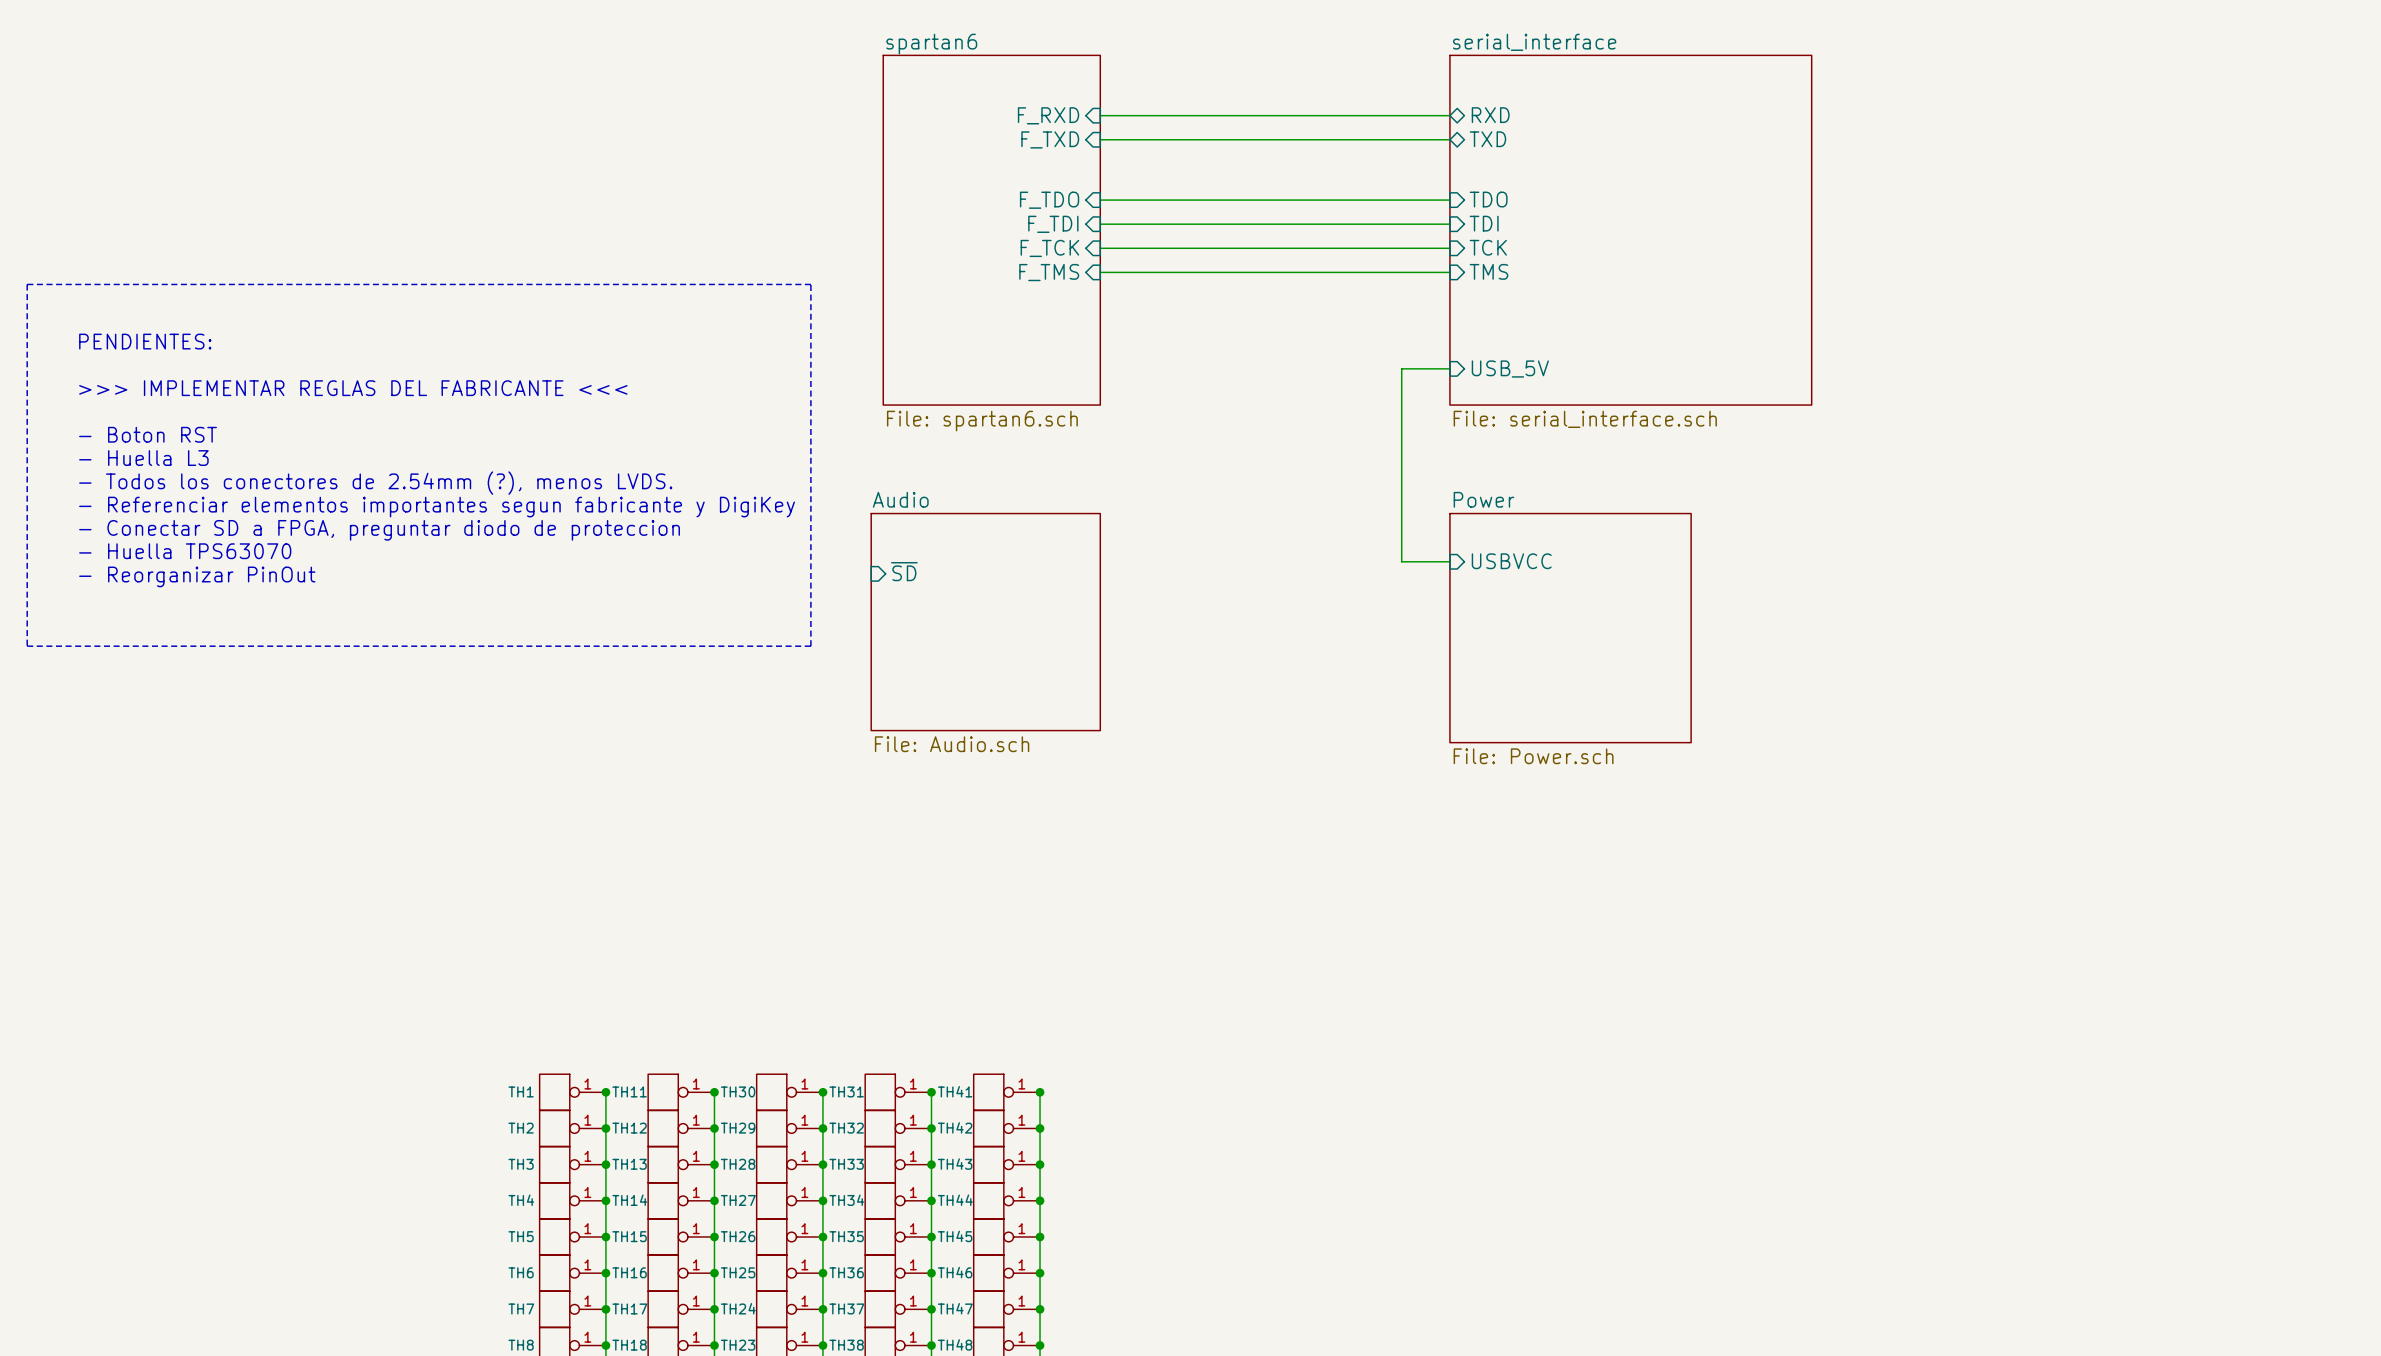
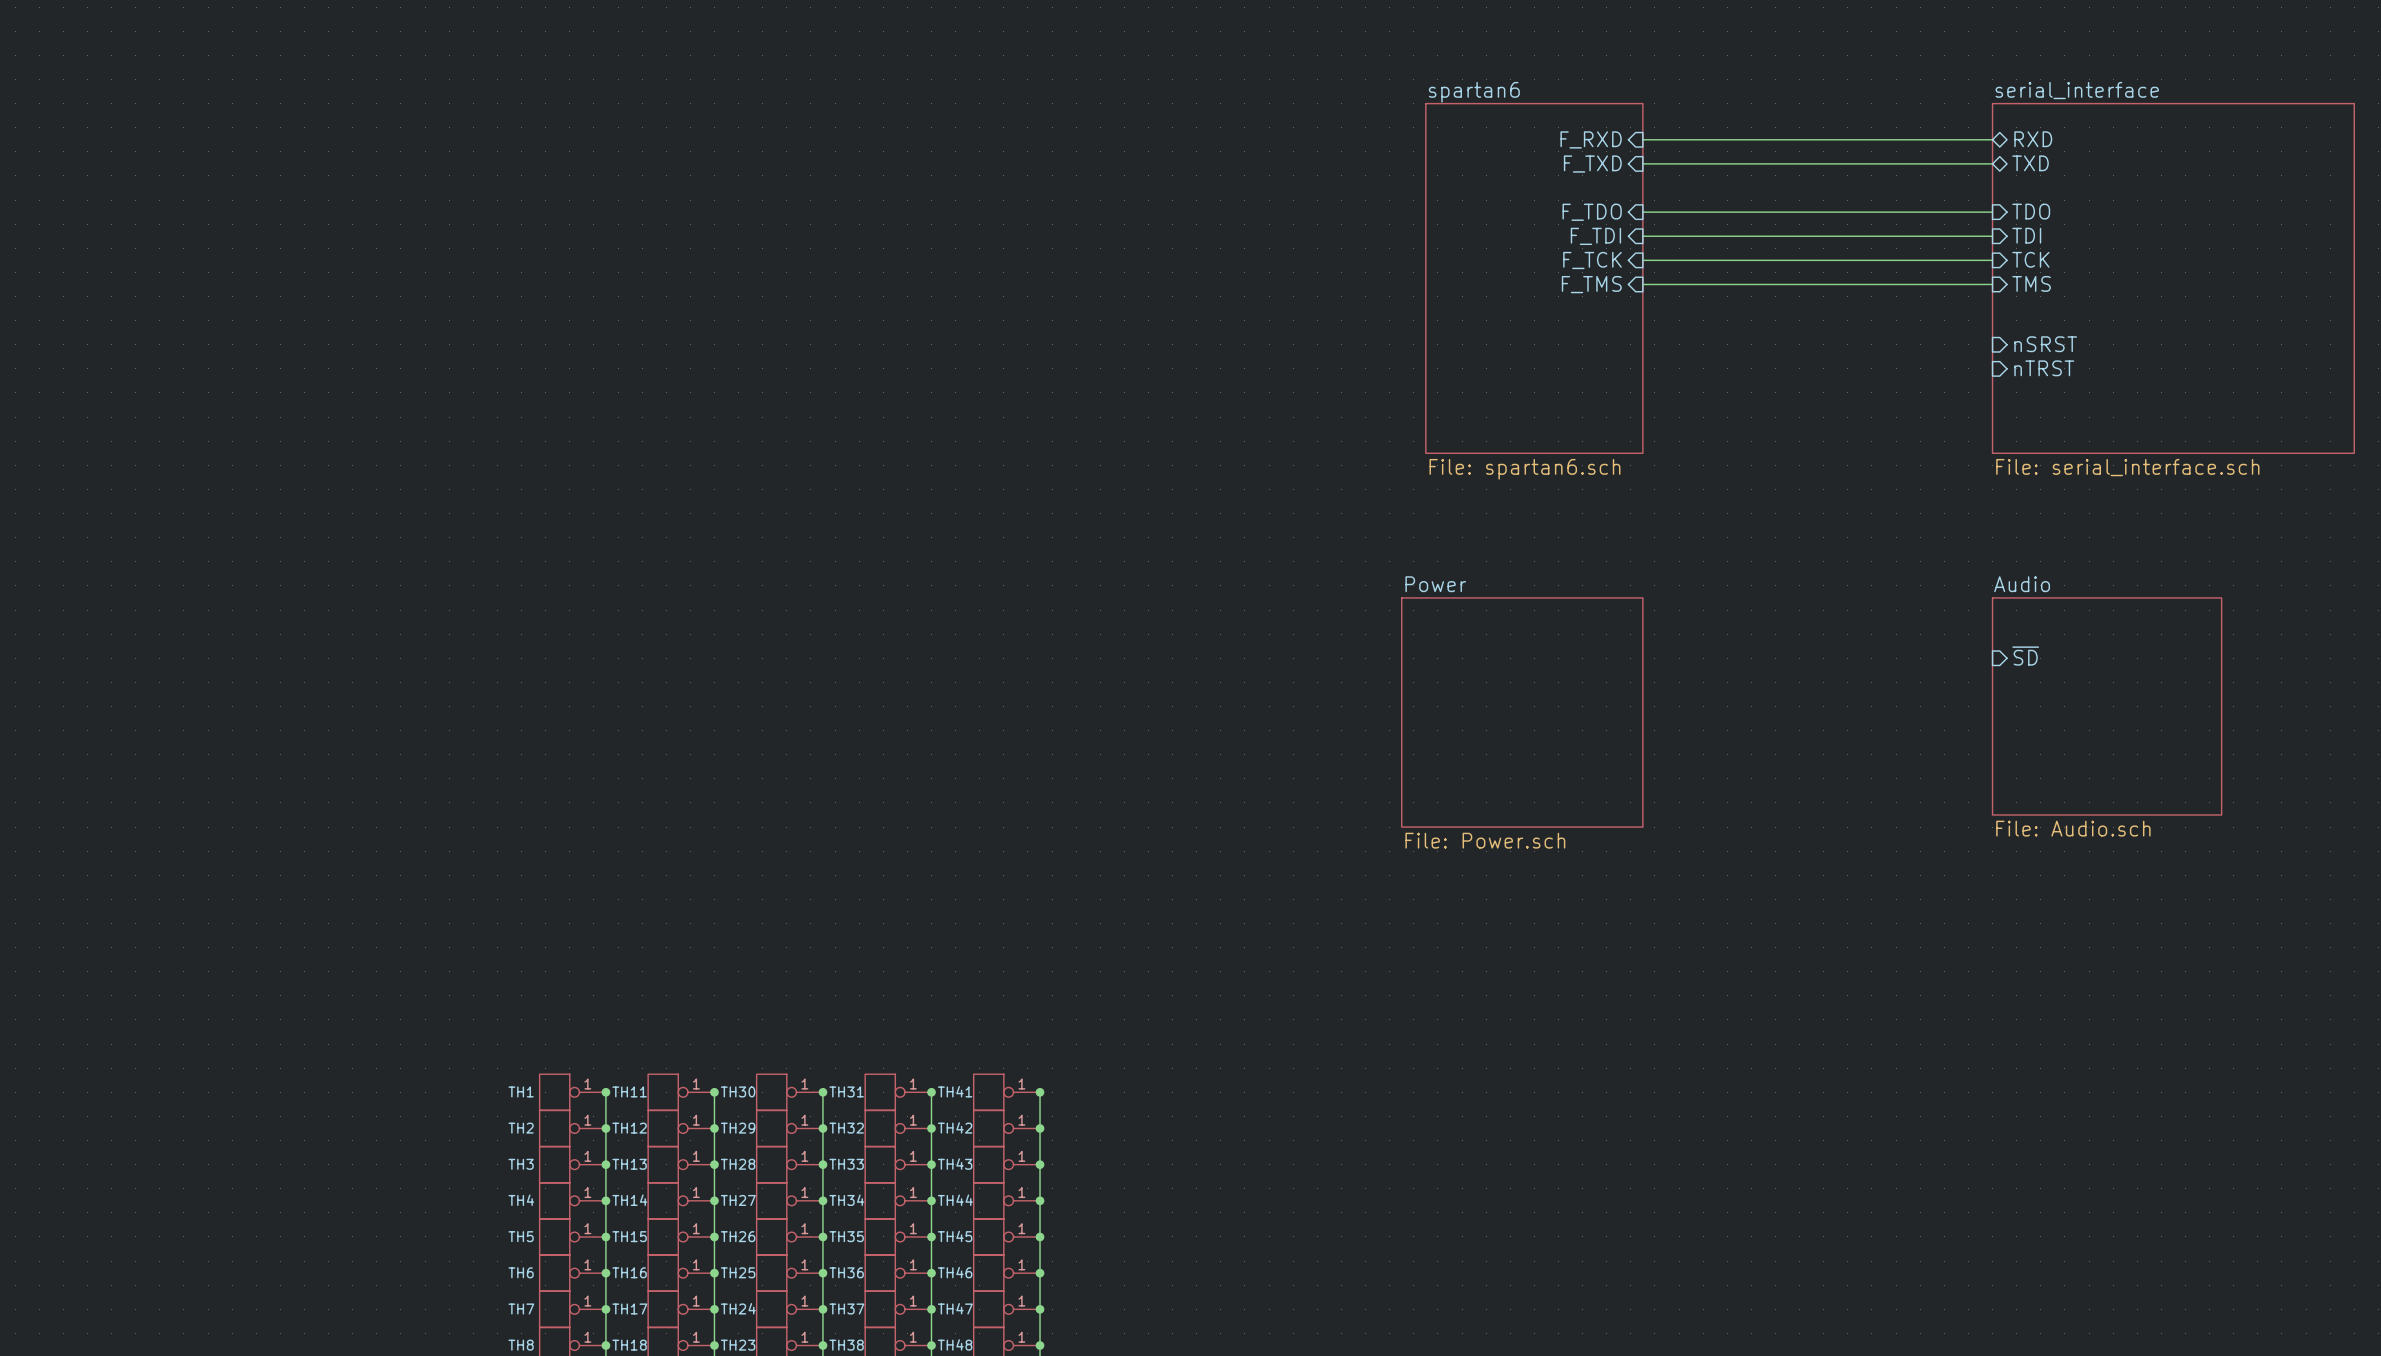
sheet pin: F_RXD (1048, 115) -> none
wire: (1100, 115) (1449, 115) -> none
sheet pin: RXD (1490, 115) -> none
sheet pin: F_TXD (1050, 139) -> none
wire: (1100, 139) (1449, 139) -> none
sheet pin: TXD (1487, 139) -> none
sheet pin: none -> F_RXD (1591, 139)
wire: none -> (1642, 139) (1992, 139)
sheet pin: none -> RXD (2033, 139)
wire: none -> (1642, 163) (1992, 163)
sheet pin: none -> TXD (2030, 163)
sheet pin: none -> F_TXD (1592, 164)
sheet pin: TDO (1488, 199) -> none
sheet pin: F_TDO (1049, 200) -> none
wire: (1100, 200) (1449, 200) -> none
sheet pin: none -> TDO (2031, 211)
sheet pin: none -> F_TDO (1592, 212)
wire: none -> (1642, 212) (1992, 212)
sheet pin: TDI (1484, 223) -> none
sheet pin: F_TDI (1053, 224) -> none
wire: (1100, 224) (1449, 224) -> none
sheet spartan6 position: (991, 230) -> (1534, 278)
sheet serial_interface: File: serial_interface.sch (1630, 230) -> none
sheet pin: none -> TDI (2026, 235)
sheet pin: none -> F_TDI (1595, 236)
wire: none -> (1642, 236) (1992, 236)
sheet pin: TCK (1488, 247) -> none
sheet pin: F_TCK (1049, 248) -> none
wire: (1100, 248) (1449, 248) -> none
sheet pin: none -> TCK (2030, 259)
sheet pin: none -> F_TCK (1592, 260)
wire: none -> (1642, 260) (1992, 260)
sheet pin: TMS (1488, 271) -> none
sheet pin: F_TMS (1049, 272) -> none
wire: (1100, 272) (1449, 272) -> none
sheet serial_interface: none -> File: serial_interface.sch (2173, 278)
sheet pin: none -> TMS (2031, 283)
line: (27, 284) (27, 646) (810, 646) (810, 284) (27, 284) -> none
sheet pin: none -> F_TMS (1591, 284)
wire: none -> (1642, 284) (1992, 284)
text: PENDIENTES: (145, 341) -> none
sheet pin: none -> nSRST (2045, 344)
wire: (1449, 368) (1401, 368) (1401, 561) (1449, 561) -> none
sheet pin: none -> nTRST (2044, 368)
sheet pin: USB_5V (1510, 369) -> none
text: >>> IMPLEMENTAR REGLAS DEL FABRICANTE <<< (353, 388) -> none
text: - Boton RST (148, 434) -> none
text: - Huella L3 (143, 458) -> none
text: - Todos los conectores de 2.54mm (?), menos LVDS. (375, 483) -> none
text: - Referenciar elementos importantes segun fabricante y DigiKey (437, 507) -> none
text: - Conectar SD a FPGA, preguntar diodo de proteccion (379, 530) -> none
text: - Huella TPS63070 (185, 551) -> none
sheet pin: USBVCC (1511, 561) -> none
sheet pin: ~{SD} (904, 571) -> none
text: - Reorganizar PinOut (197, 576) -> none
sheet Audio: File: Audio.sch (985, 622) -> none
sheet Power position: (1570, 628) -> (1522, 712)
sheet pin: none -> ~{SD} (2025, 656)
sheet Audio: none -> File: Audio.sch (2107, 706)

